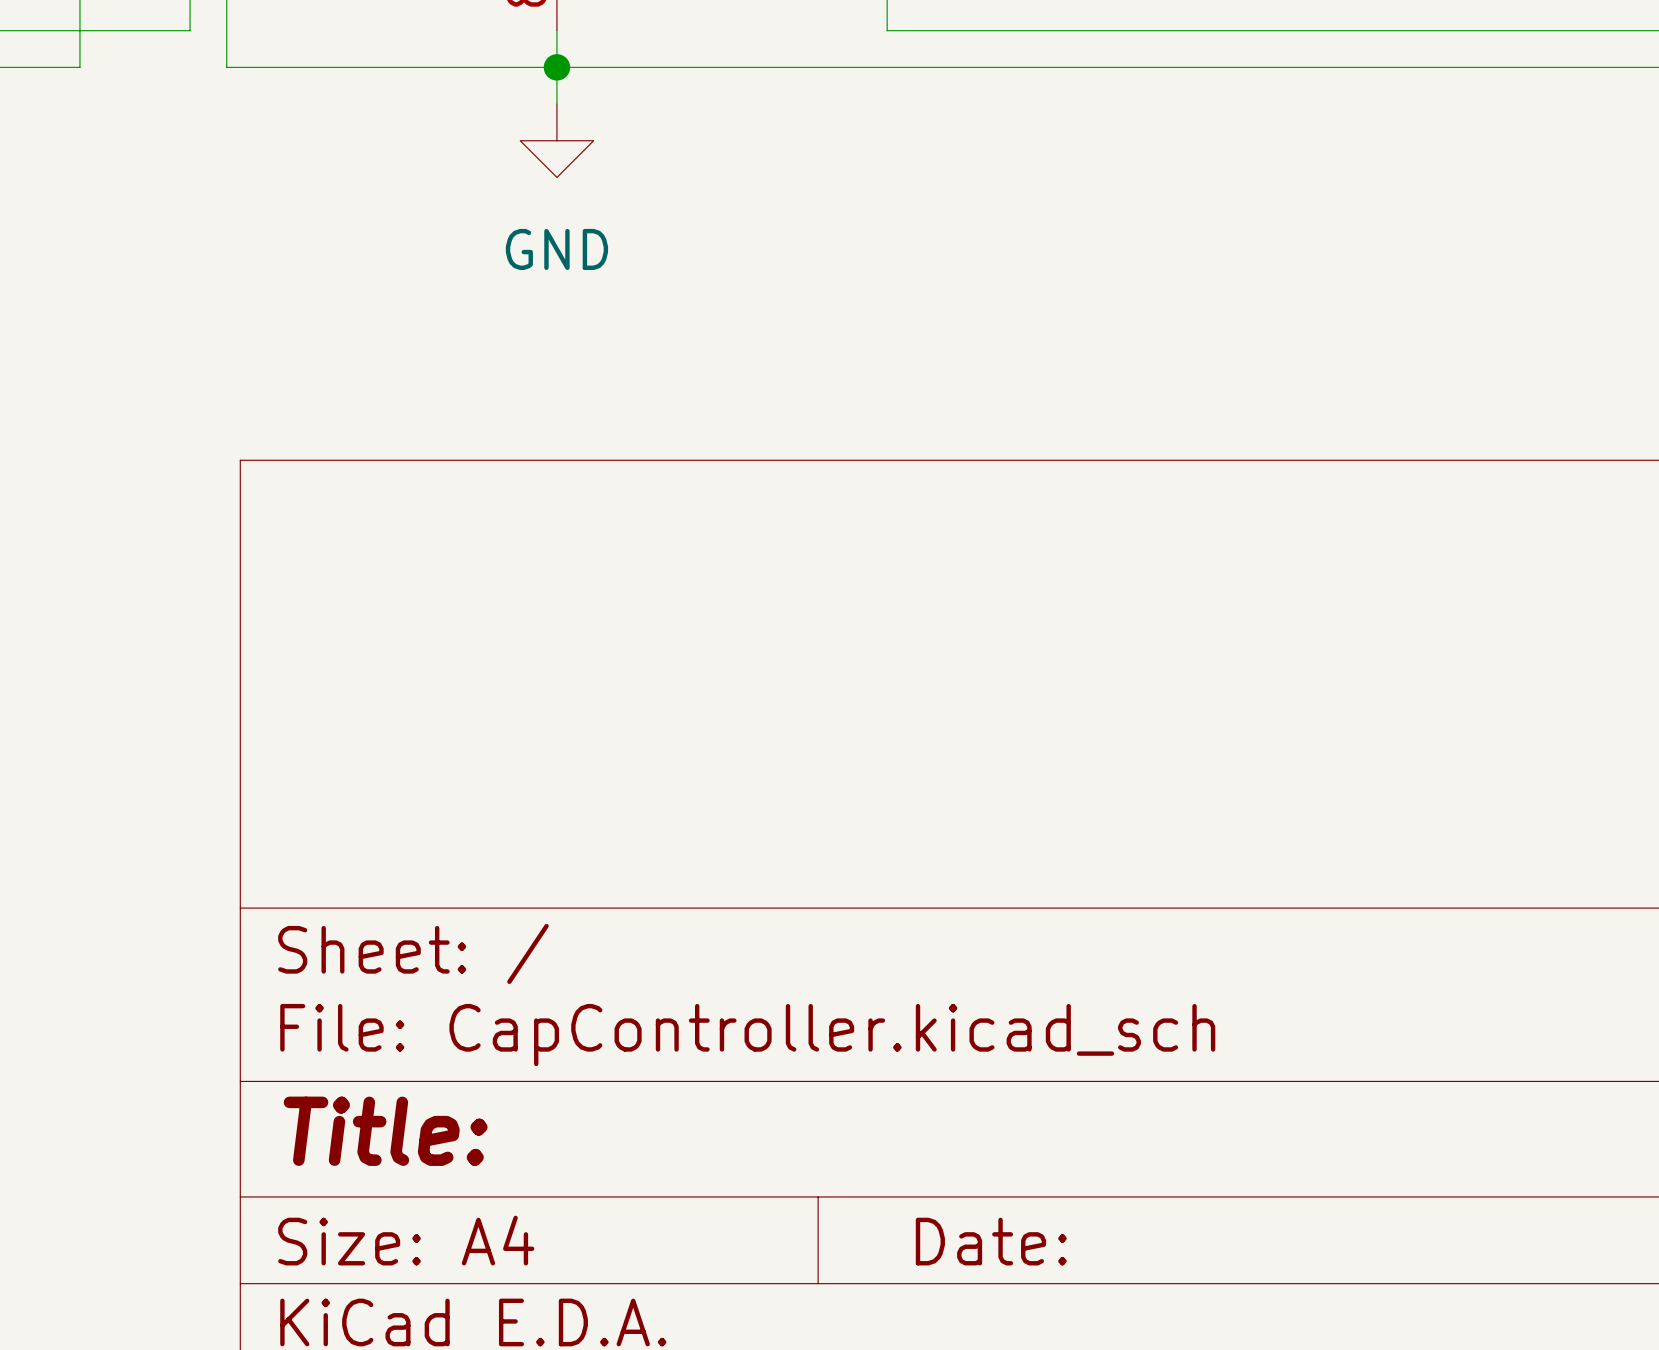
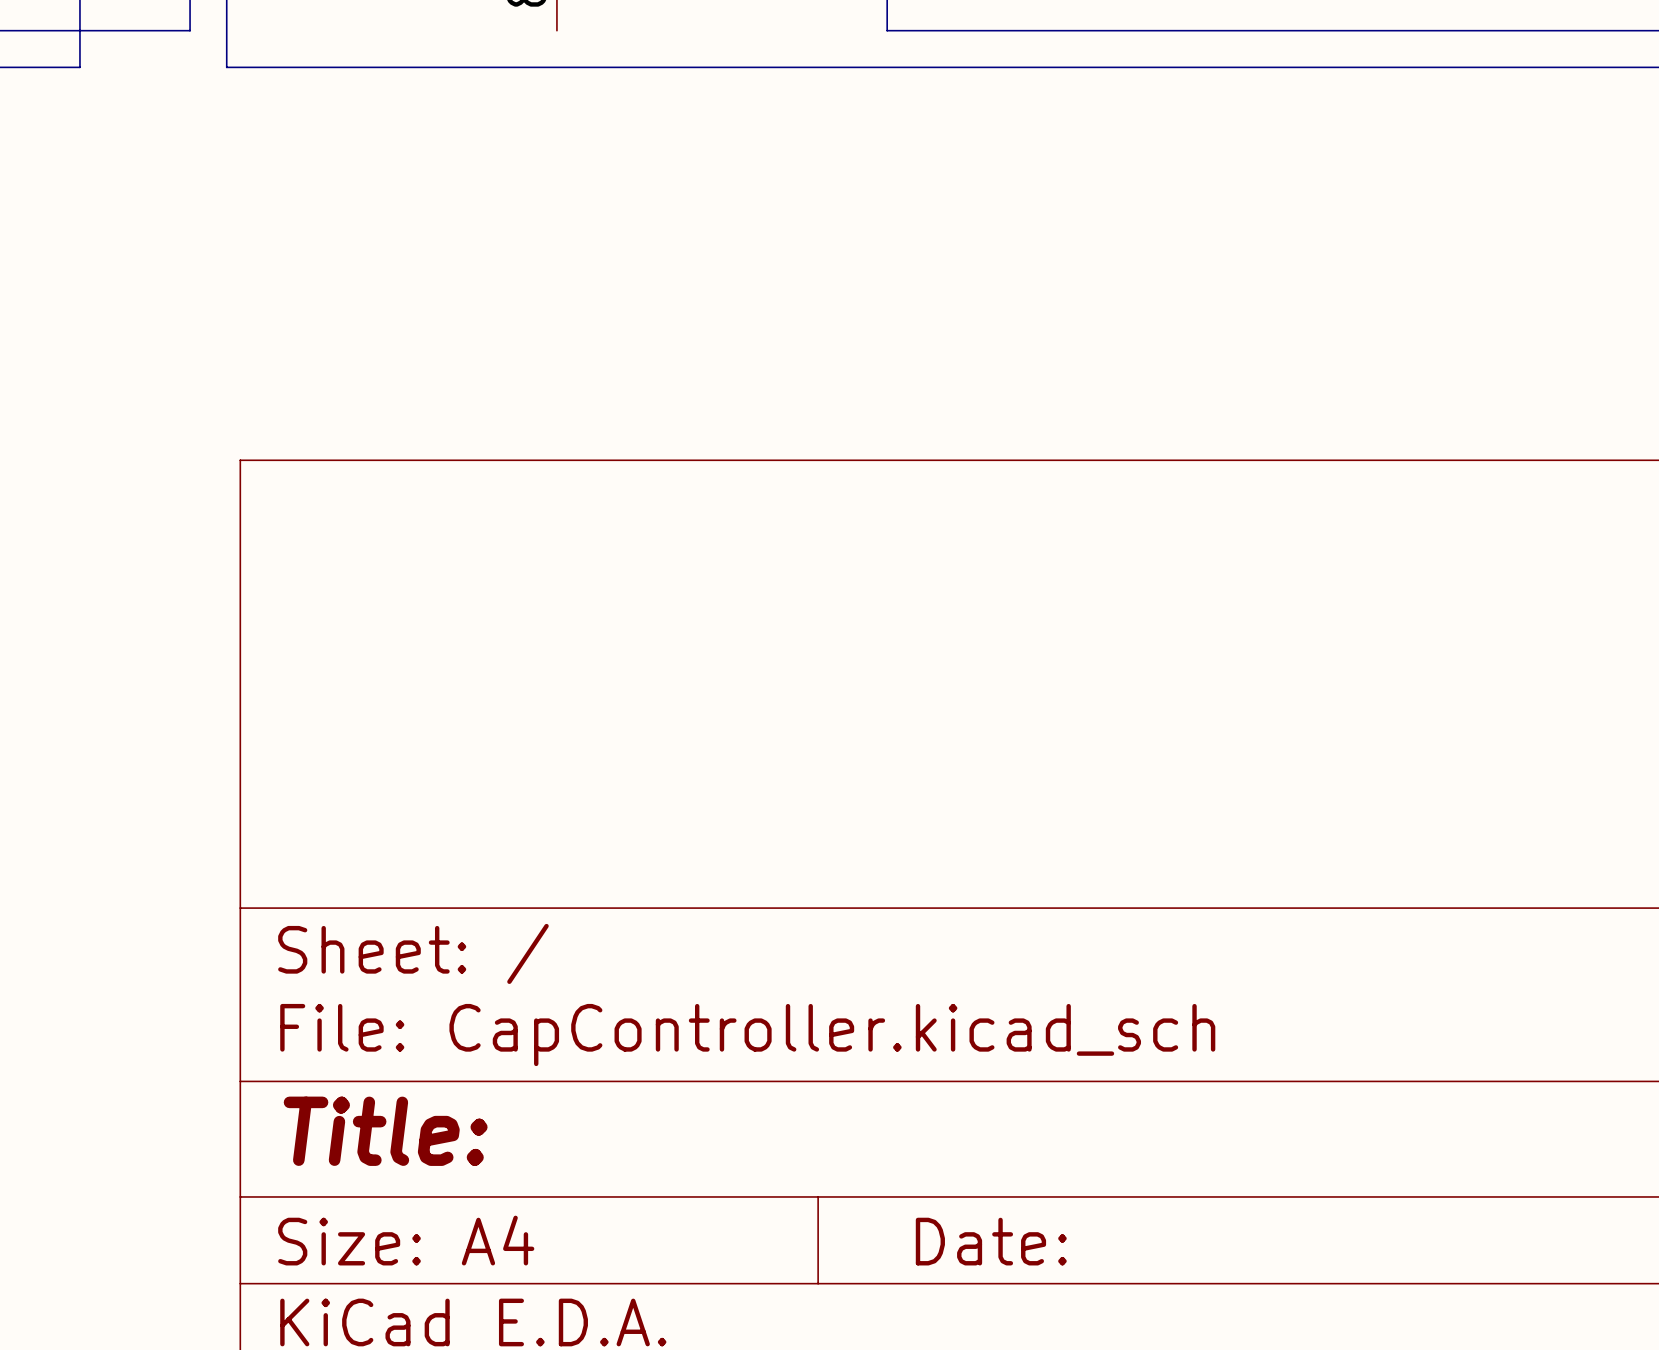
wire: (556, 30) (556, 104) -> none
junction: (556, 67) -> none
power symbol: GND (556, 140) -> none

